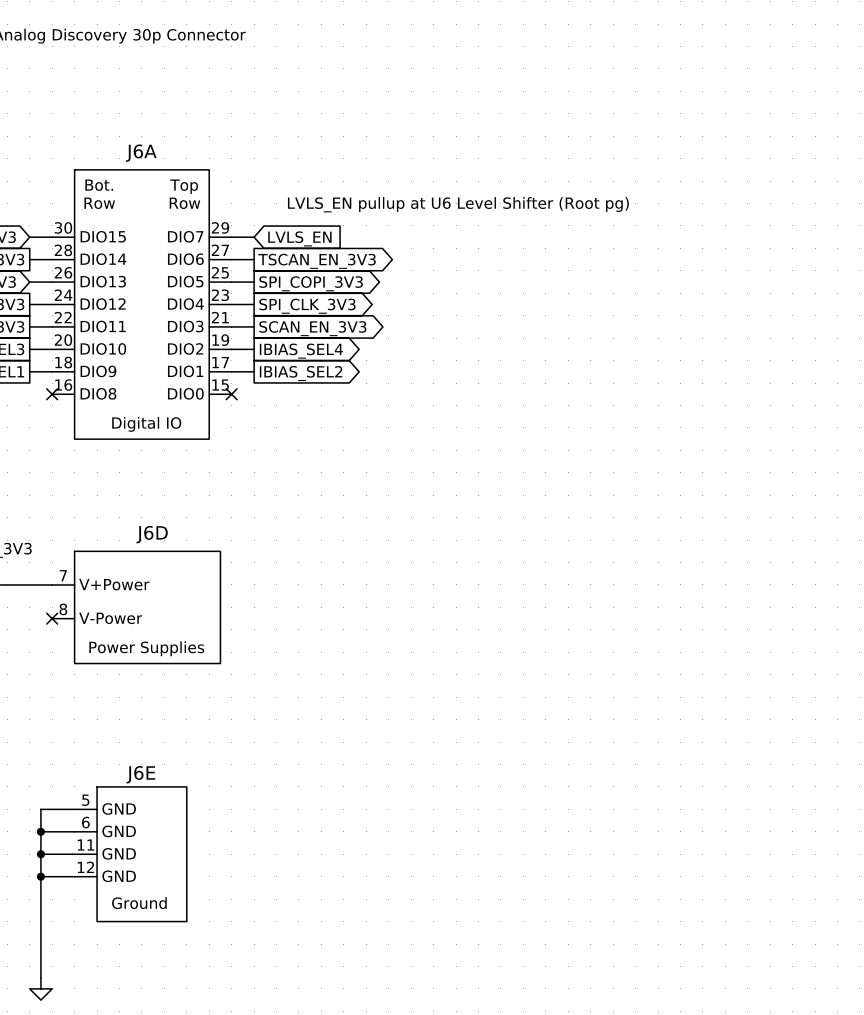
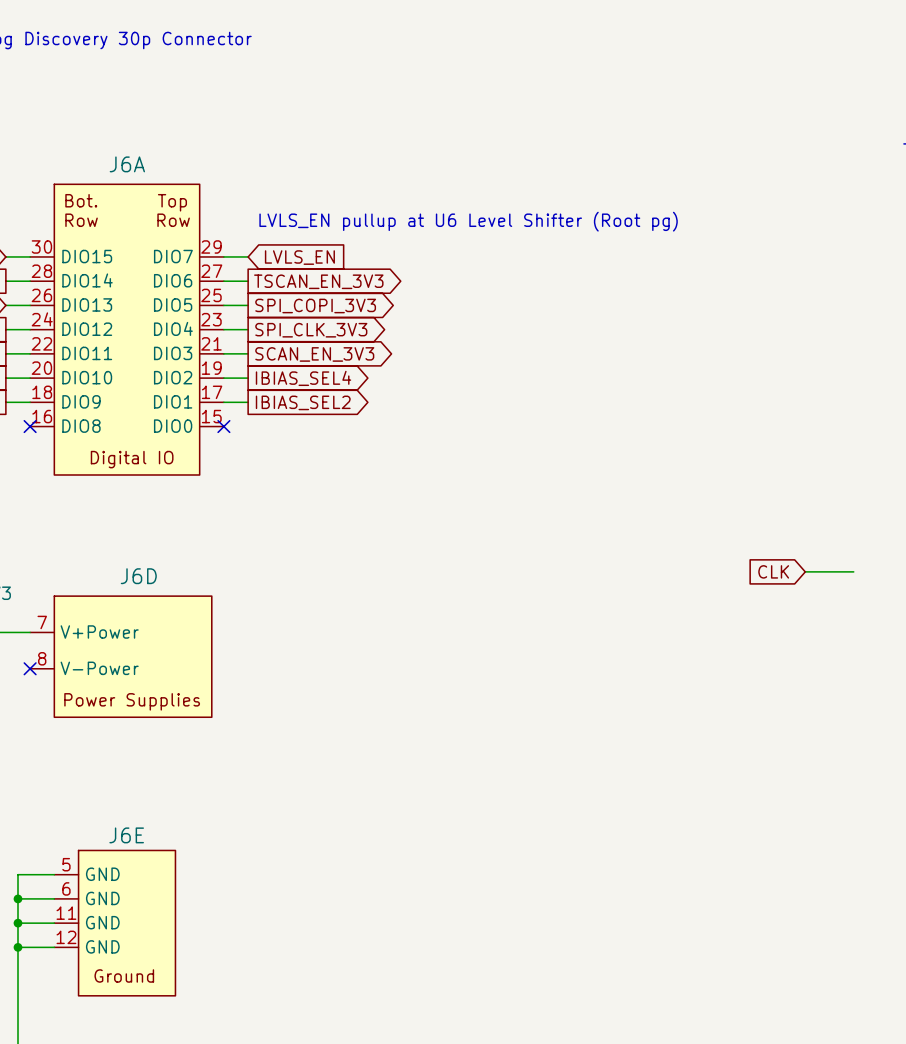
global label: none -> CLK (773, 571)
wire: none -> (805, 571) (853, 571)

